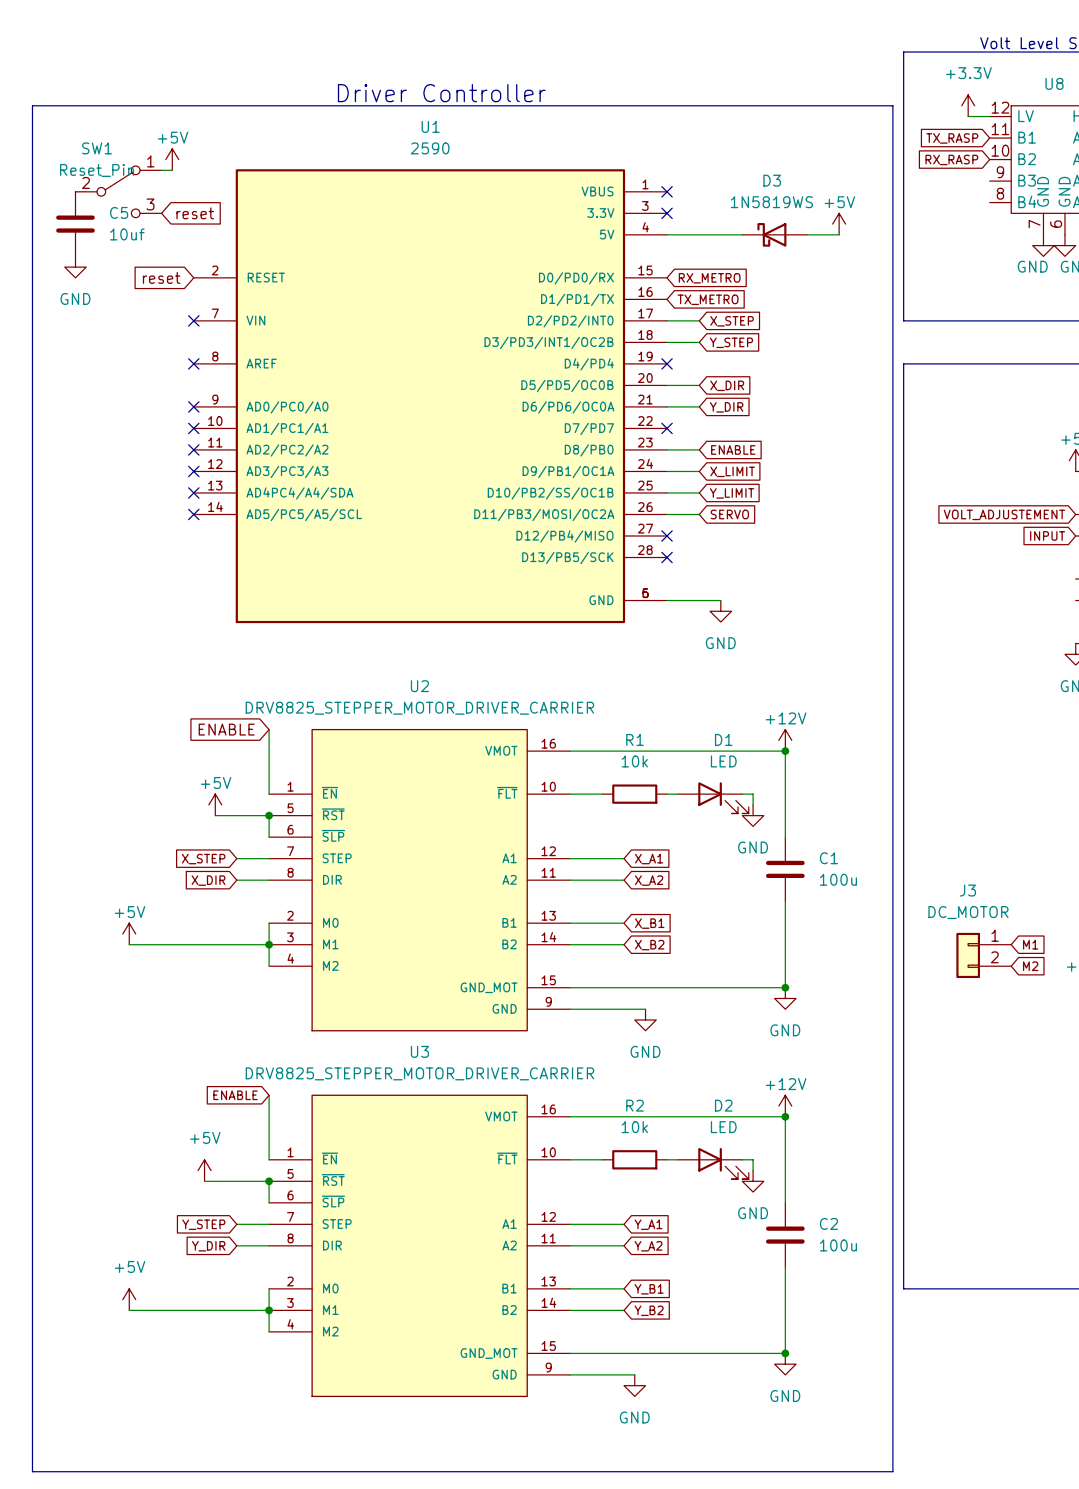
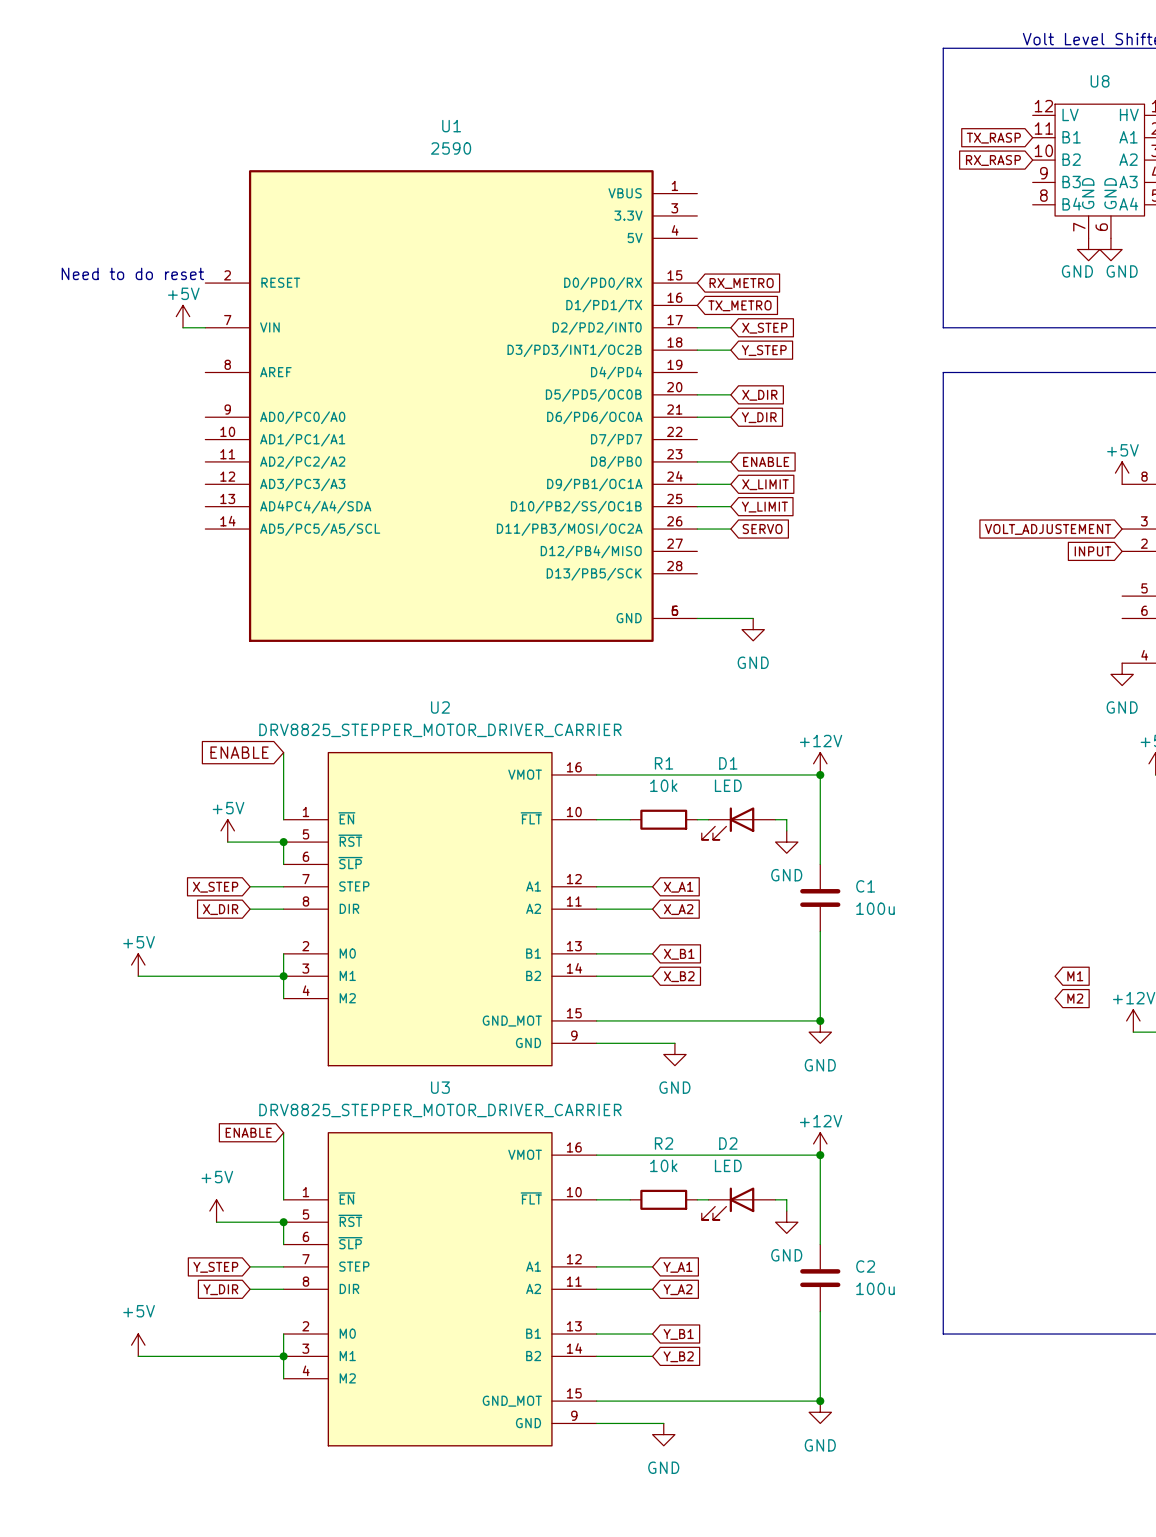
text: Driver Controller (441, 93) -> none
line: (32, 105) (892, 105) (892, 1471) (32, 1471) (32, 105) -> none
power symbol: +3.3V (968, 105) -> none
wire: (968, 116) (989, 116) -> none
power symbol position: +5V (172, 159) -> +5V (183, 316)
wire: (161, 170) (172, 170) -> none
SW1: Reset_Pin (118, 191) -> none
no-connect mark: (667, 191) -> none
global label: reset (195, 213) -> none
no-connect mark: (667, 213) -> none
C5: 10uf (75, 224) -> none
power symbol: +5V (839, 224) -> none
wire: (667, 234) (742, 234) -> none
D3: 1N5819WS (774, 234) -> none
wire: (806, 234) (839, 234) -> none
power symbol: GND (75, 267) -> none
text: none -> Need to do reset (132, 273)
global label: reset (161, 277) -> none
wire: none -> (183, 327) (205, 327)
no-connect mark: (193, 320) -> none
no-connect mark: (193, 363) -> none
no-connect mark: (667, 363) -> none
no-connect mark: (193, 406) -> none
no-connect mark: (193, 428) -> none
no-connect mark: (667, 428) -> none
no-connect mark: (193, 449) -> none
no-connect mark: (193, 471) -> none
no-connect mark: (193, 492) -> none
no-connect mark: (193, 514) -> none
no-connect mark: (667, 536) -> none
no-connect mark: (667, 557) -> none
D1 flip: as is (723, 797) -> left-right (728, 823)
J3: DC_MOTOR (983, 955) -> none
D2 flip: as is (723, 1163) -> left-right (728, 1203)

